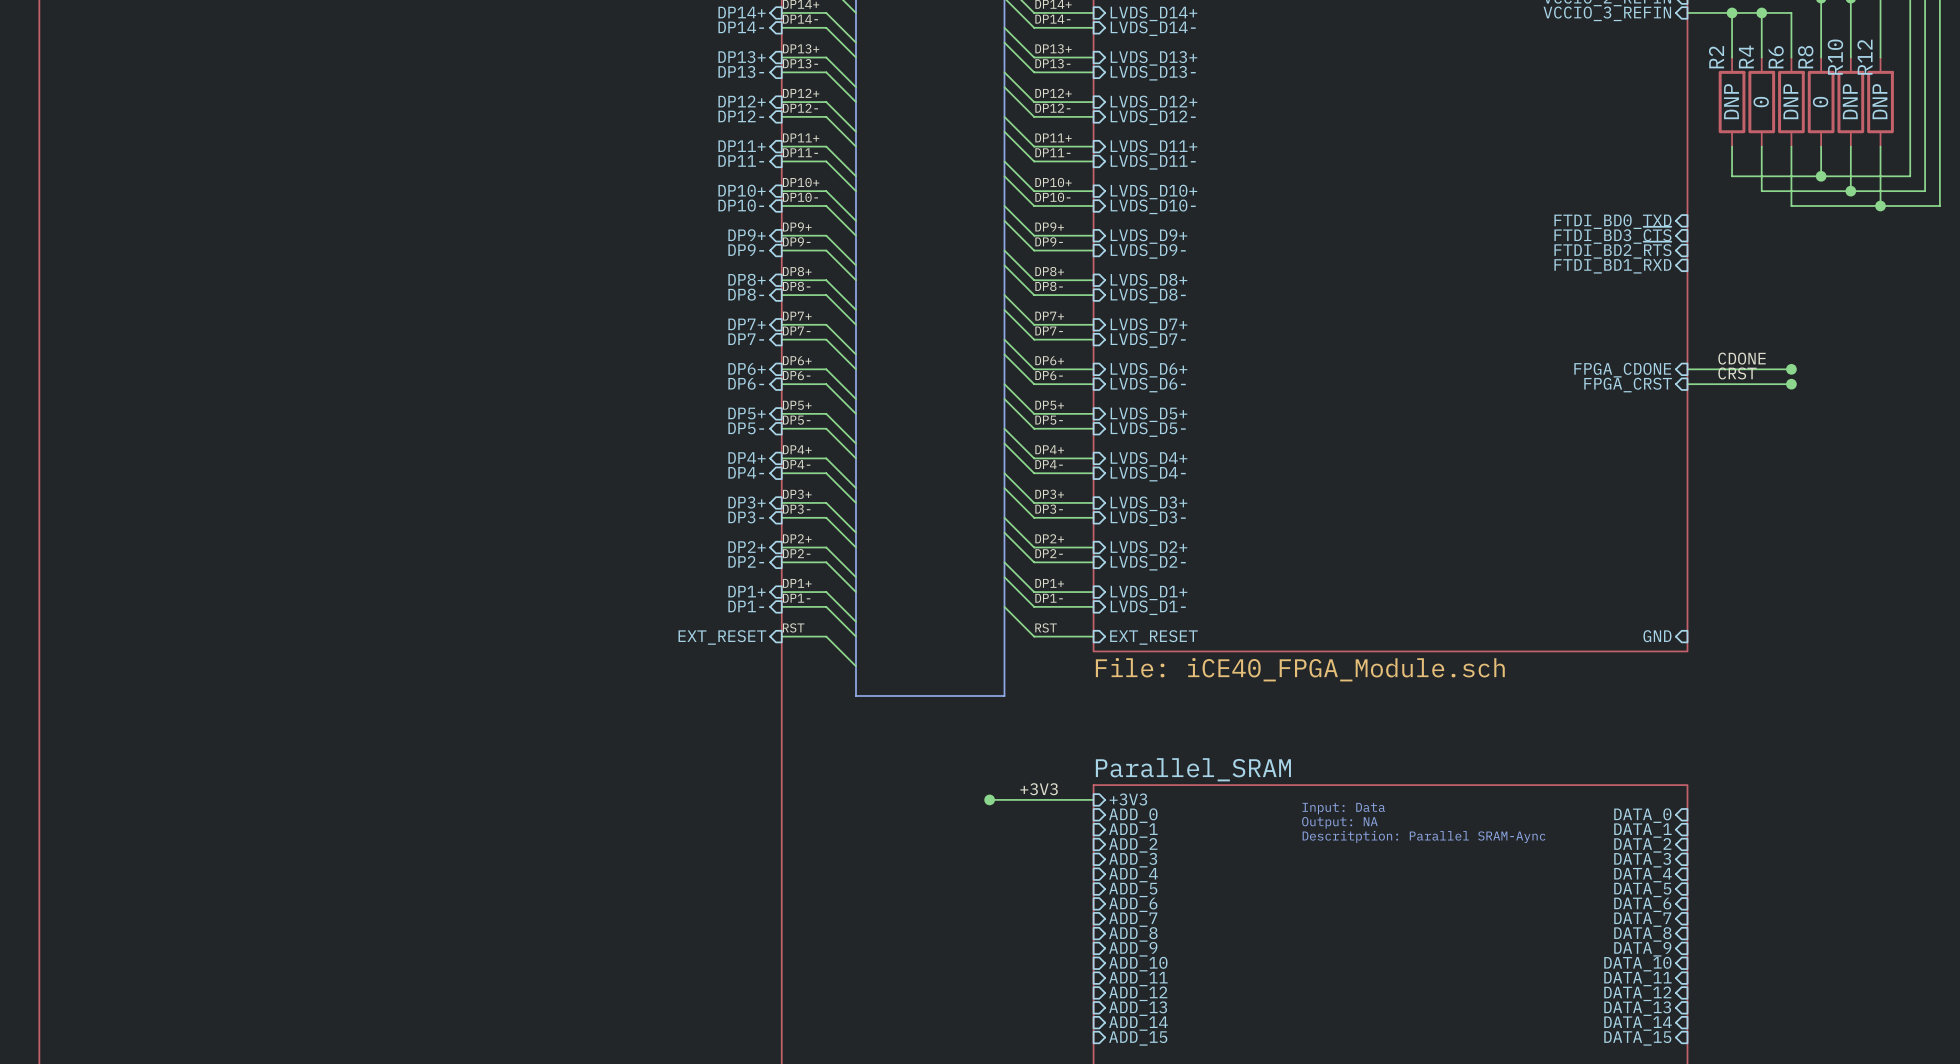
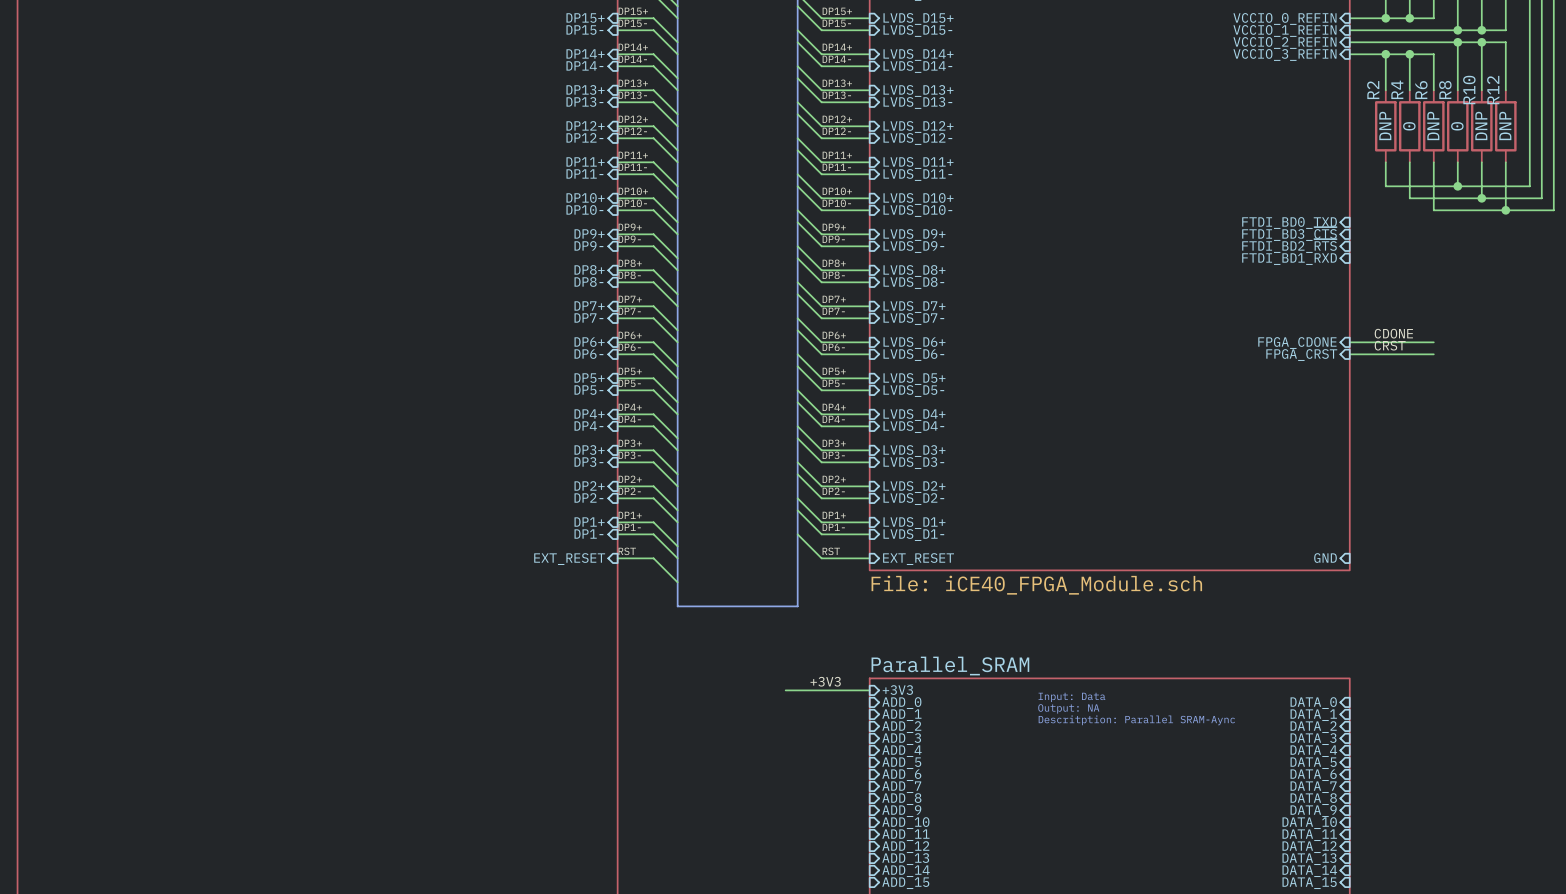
junction: (1791, 369) -> none
junction: (1791, 384) -> none
junction: (989, 799) -> none

